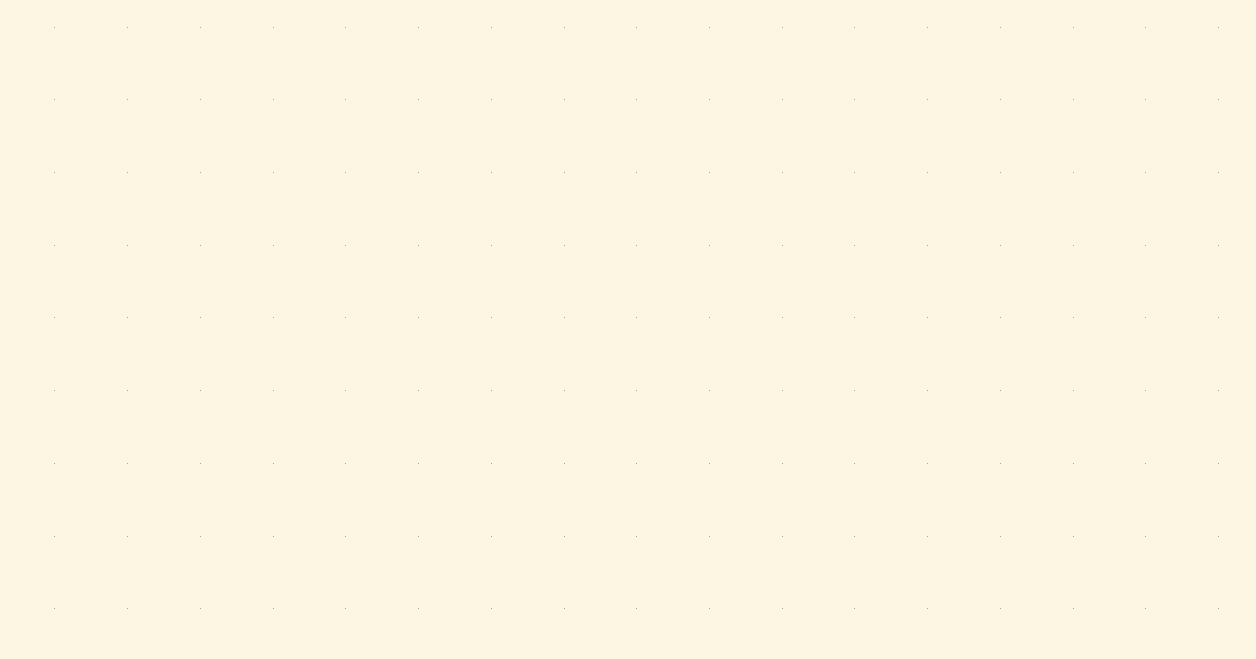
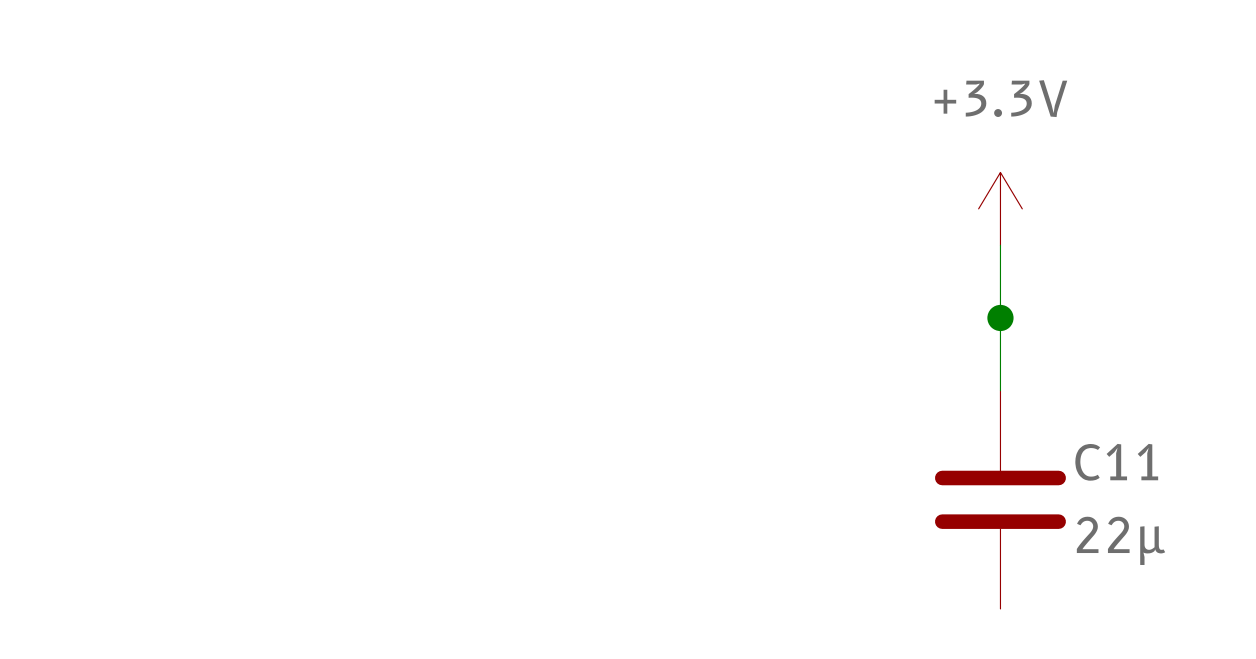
power symbol: none -> +3.3V (1000, 208)
wire: none -> (1000, 245) (1000, 390)
junction: none -> (1000, 317)
C11: none -> 22µ (1000, 499)

